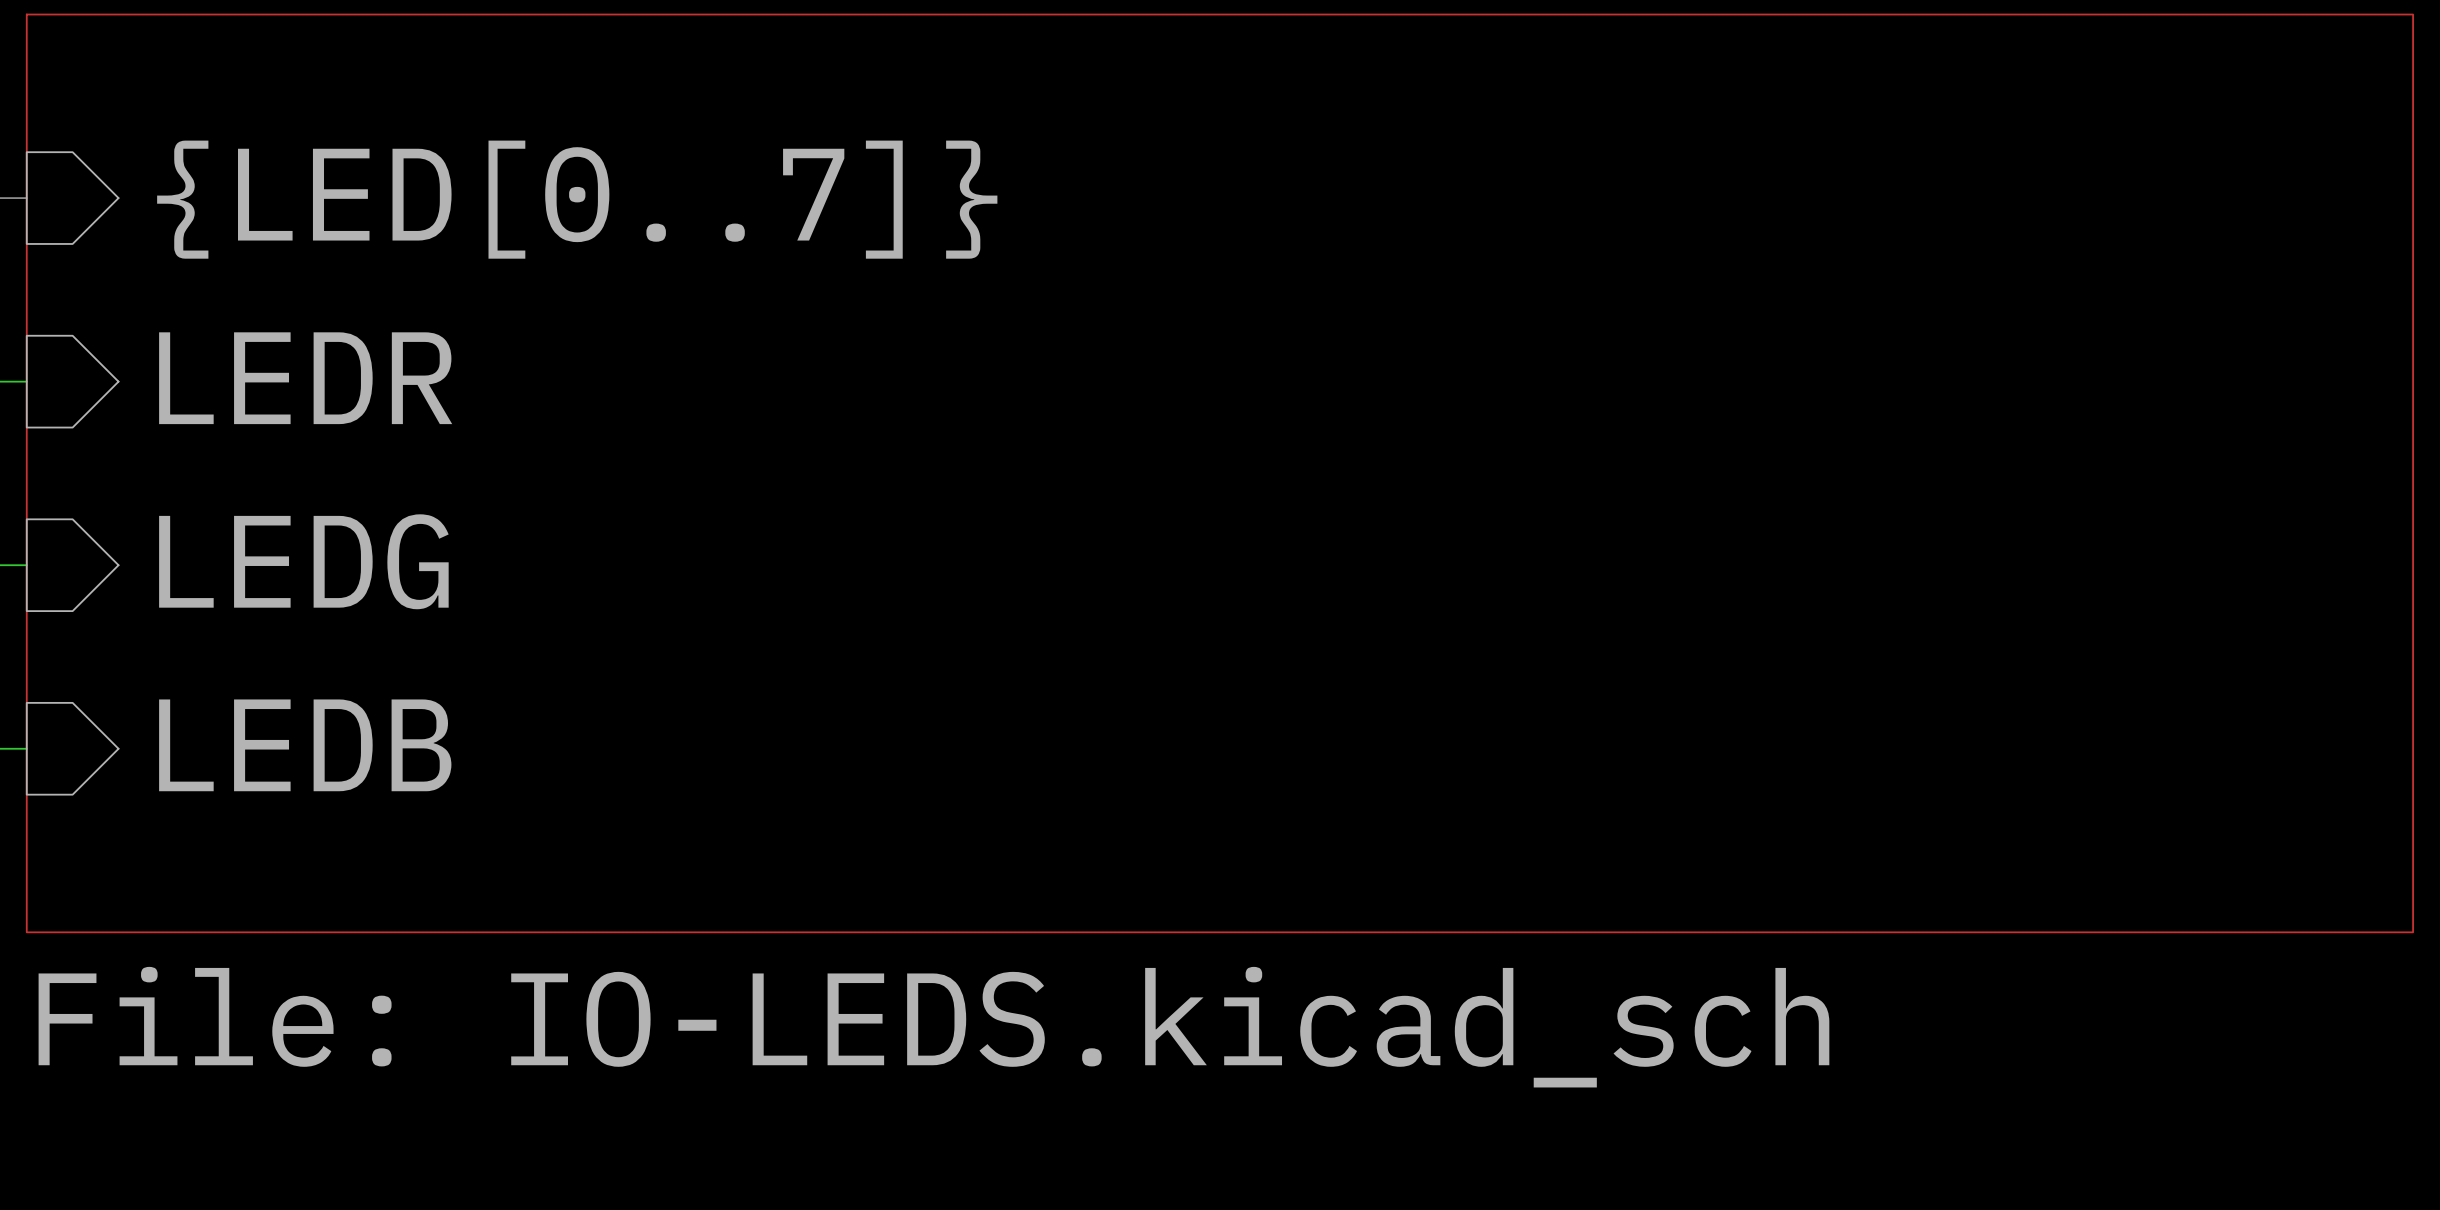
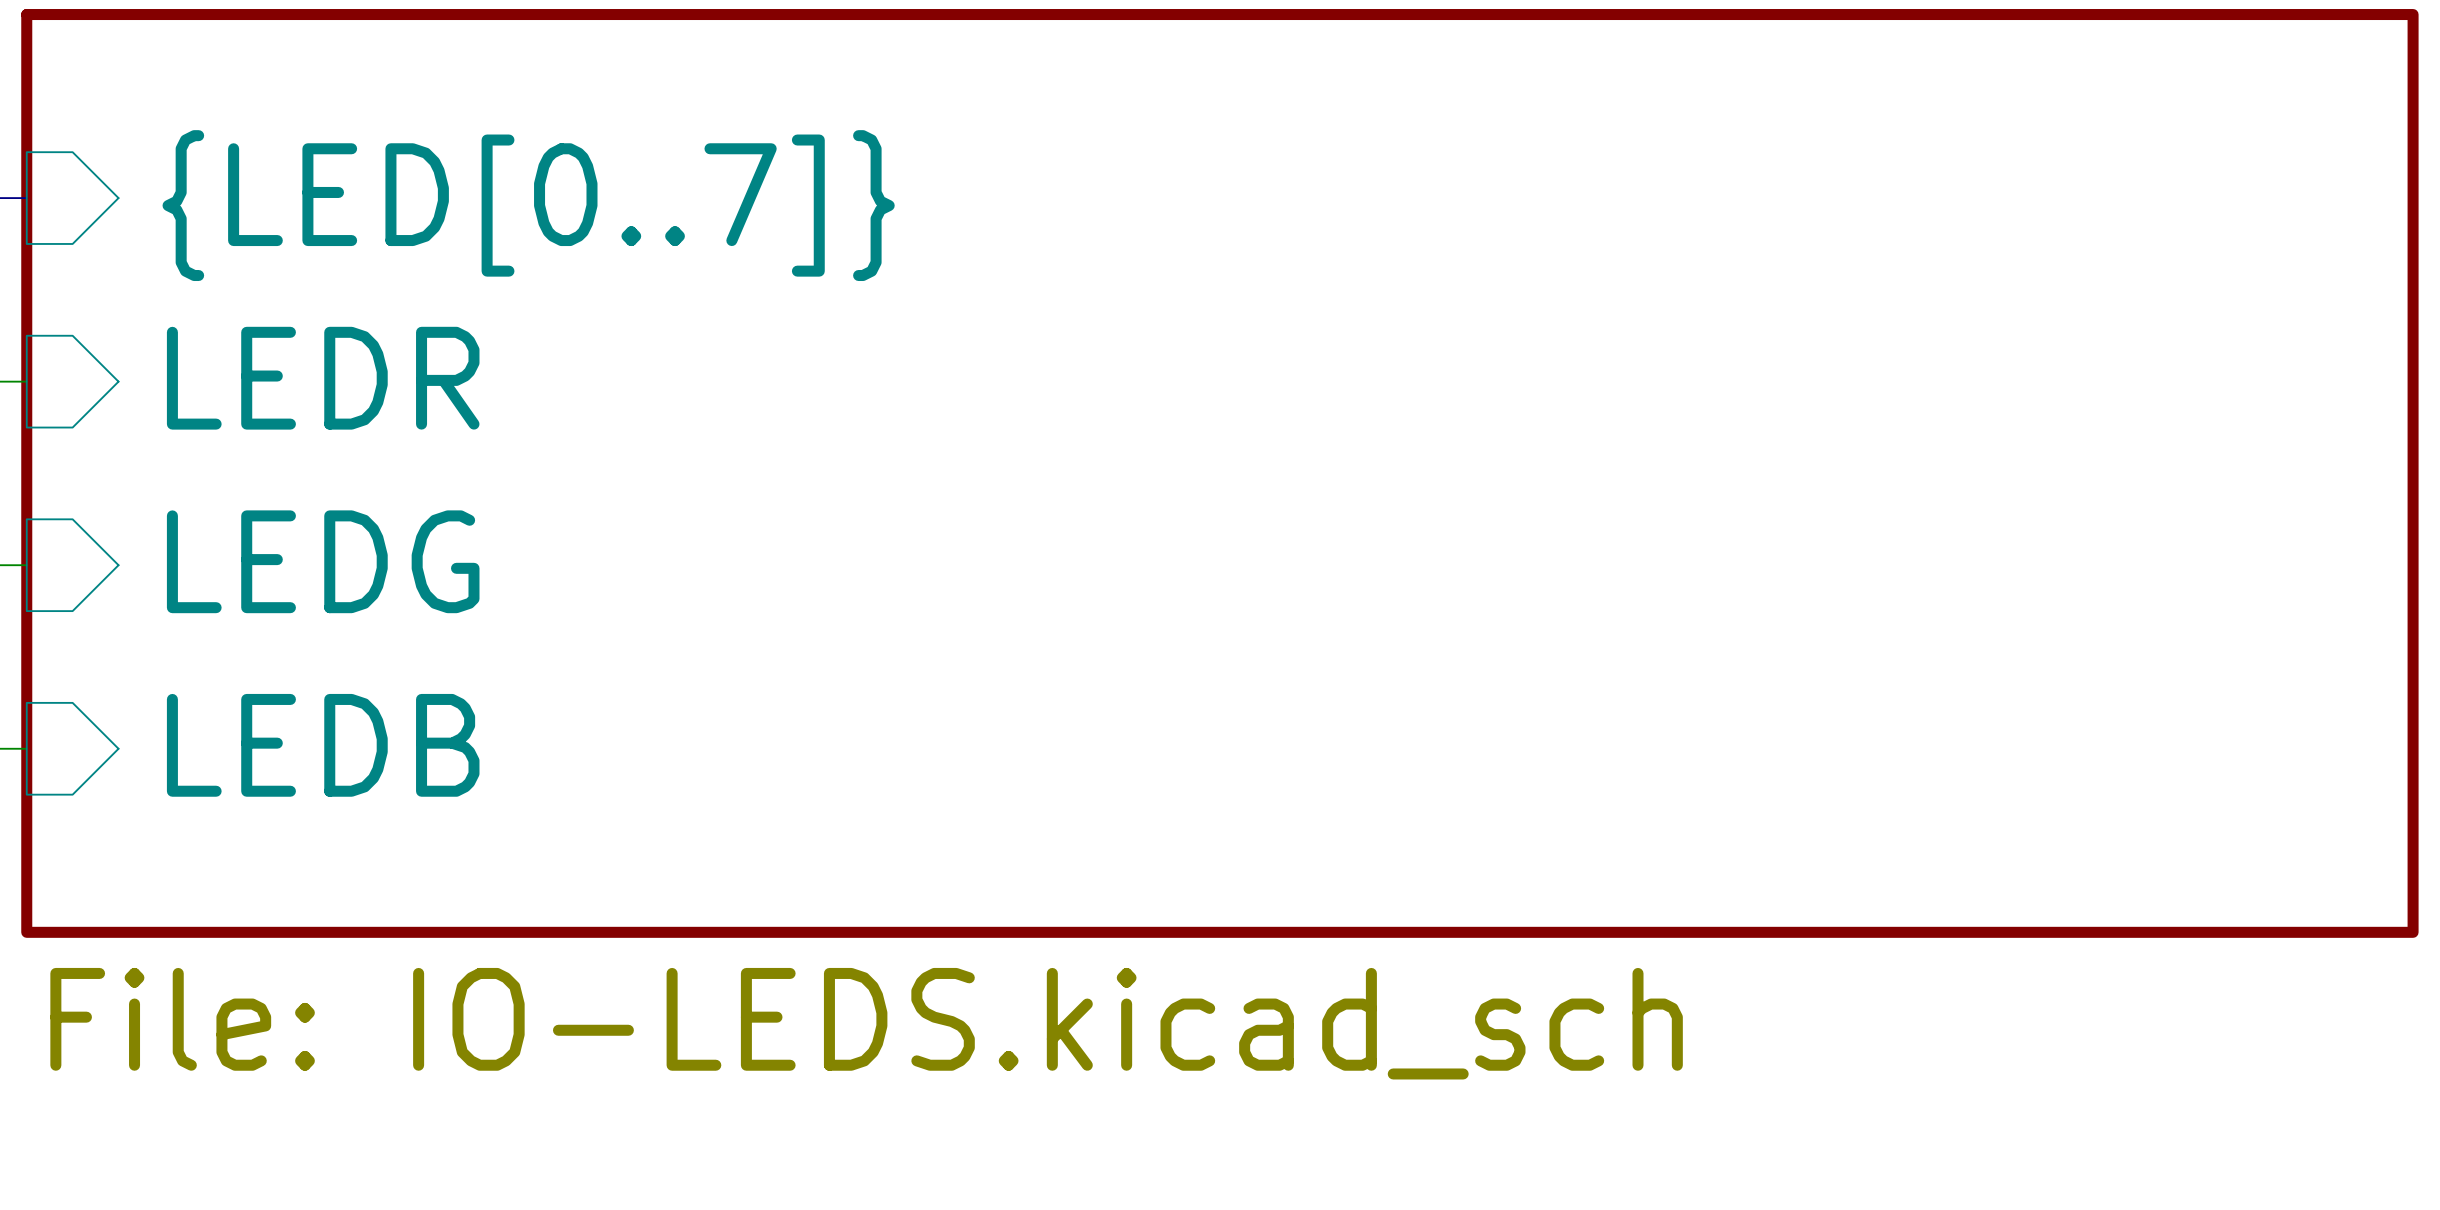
sheet shape: [26, 14, 2414, 933] -> [21, 9, 2419, 938]

